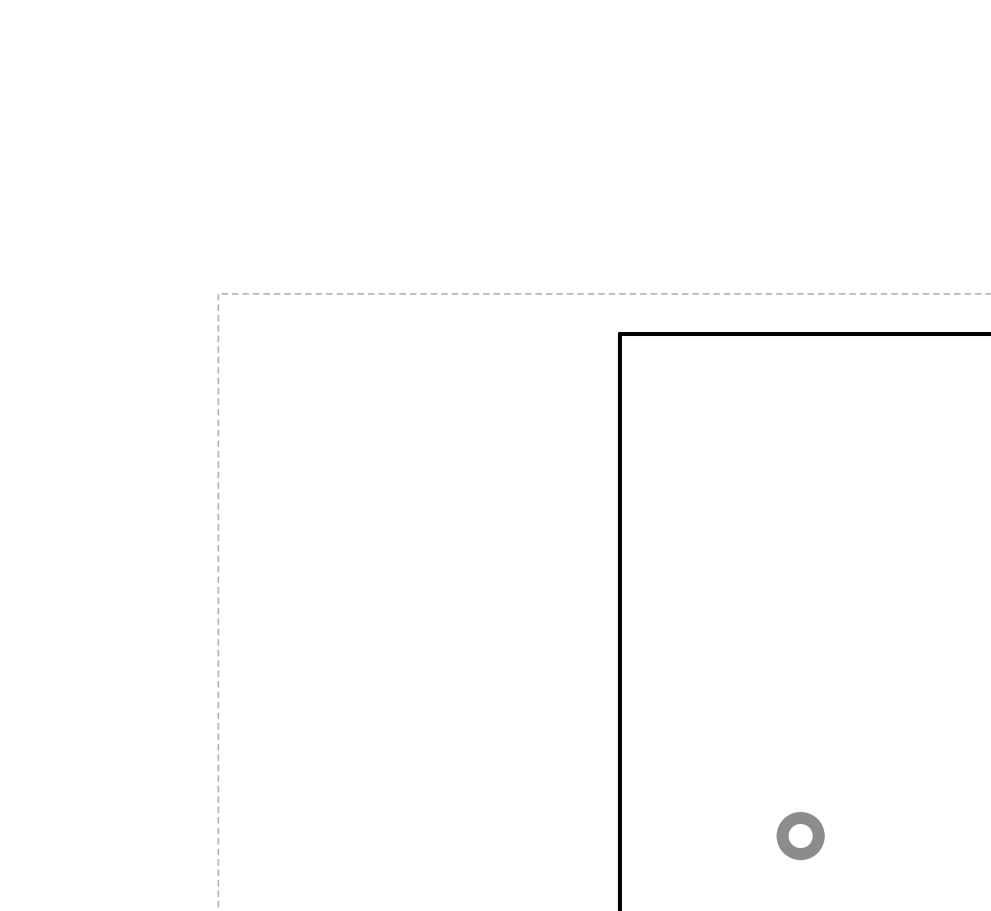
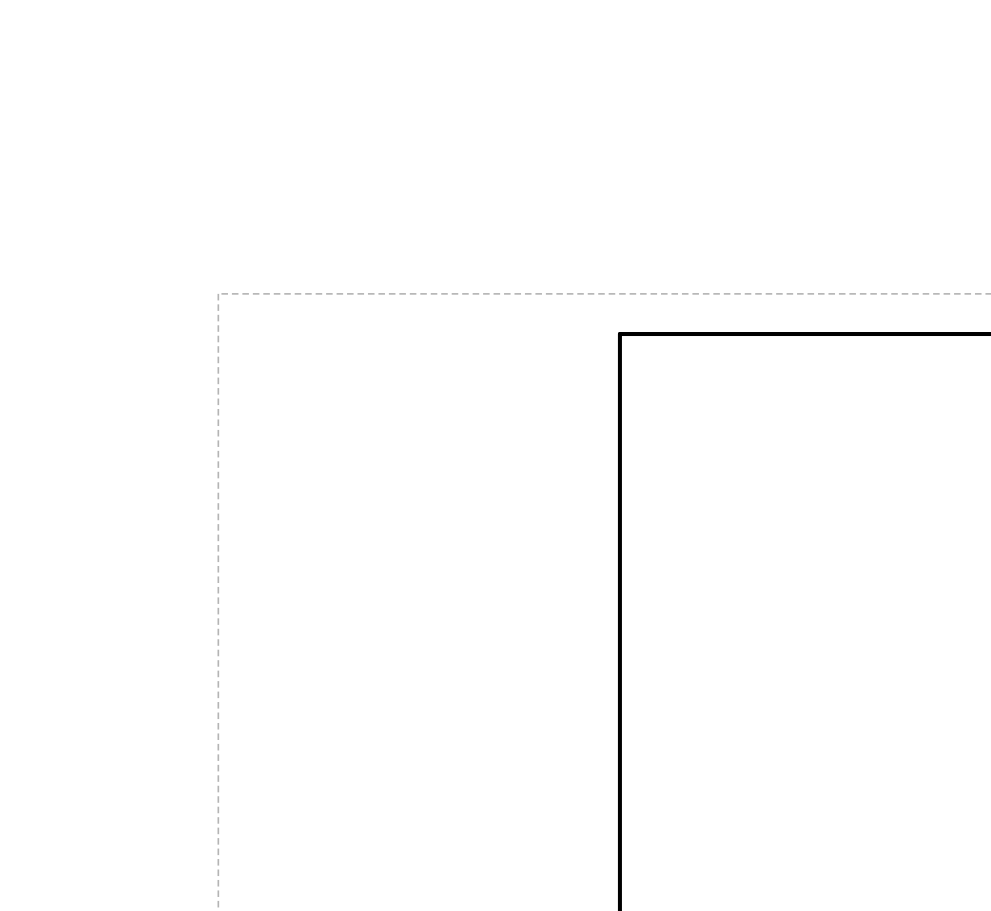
via: (800, 836) -> none

